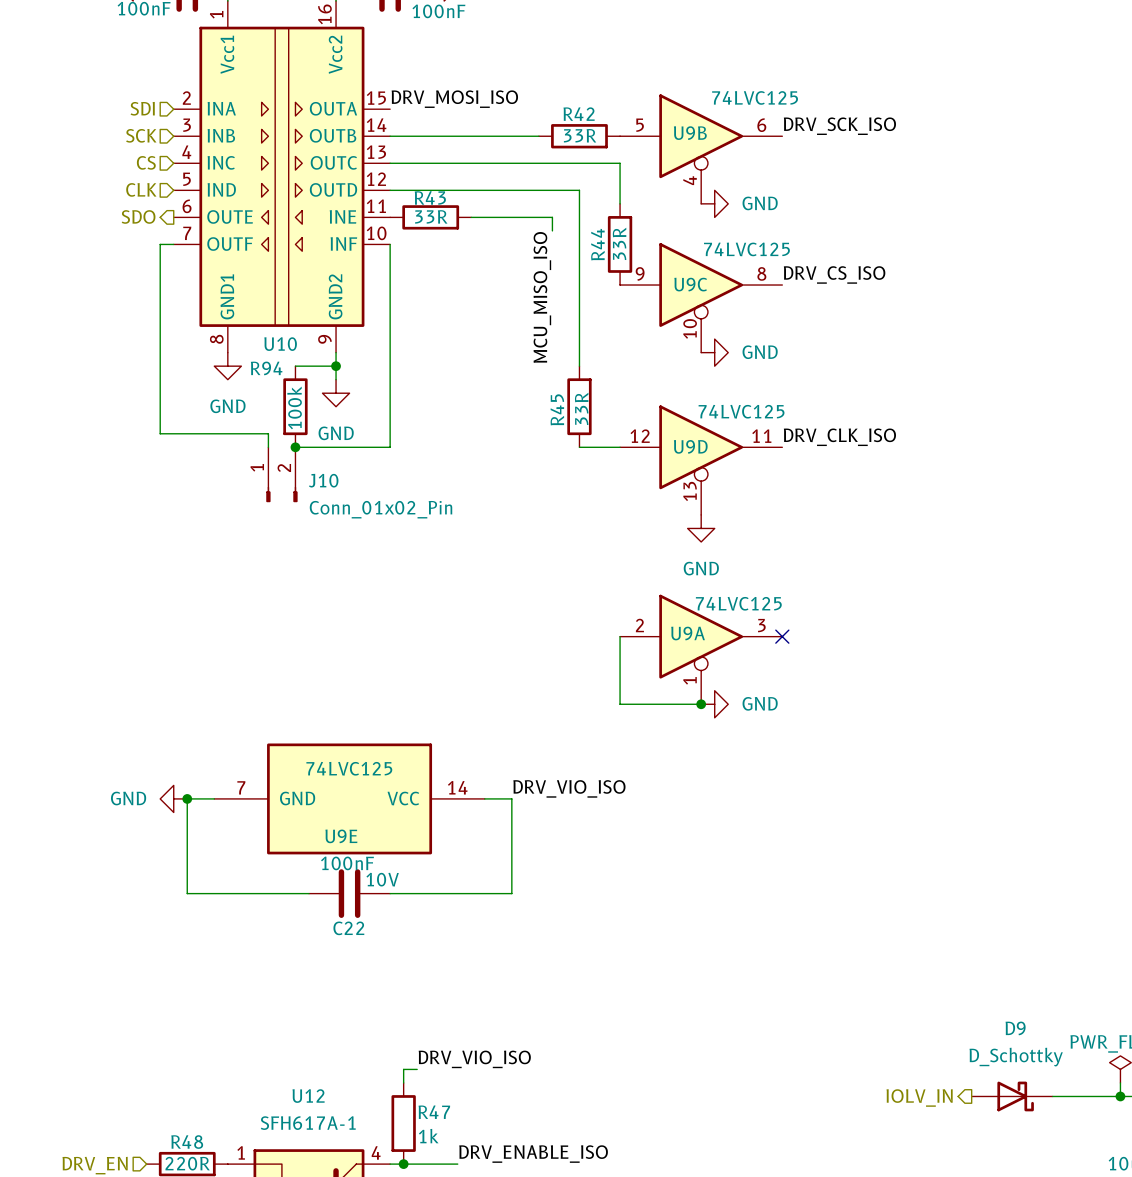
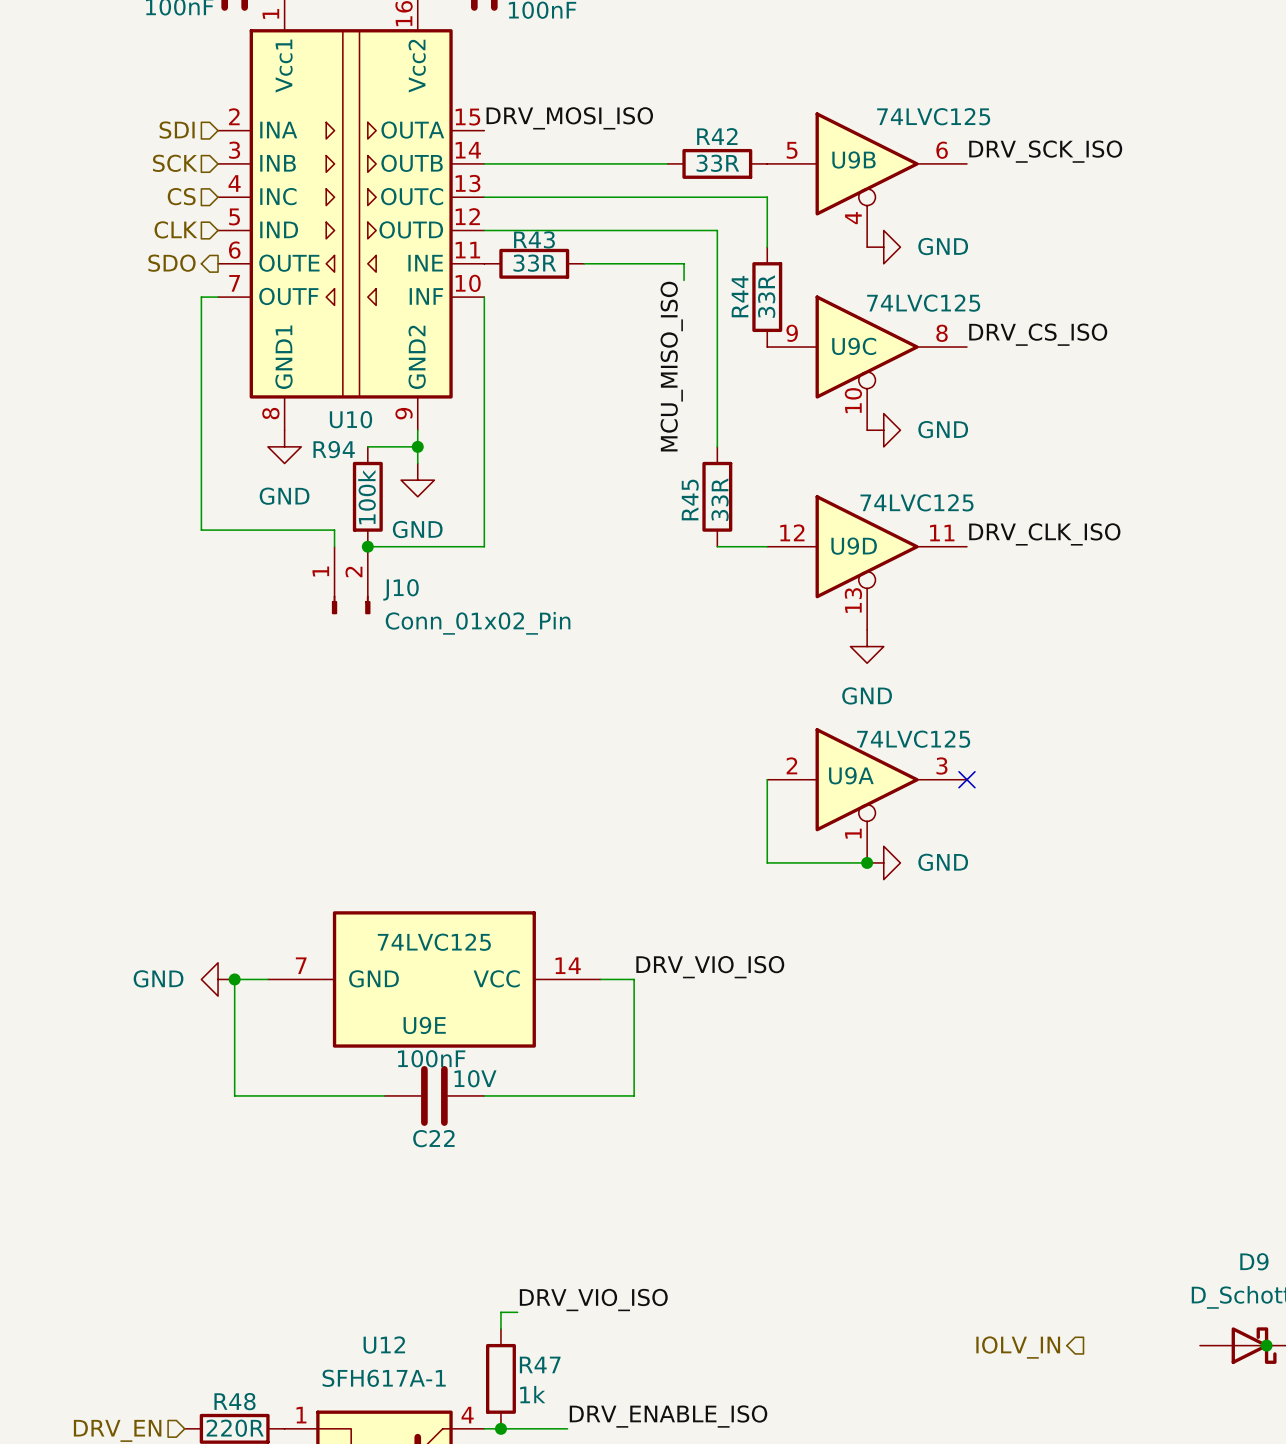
junction: none -> (1266, 1345)
hierarchical label position: IOLV_IN (919, 1097) -> IOLV_IN (1018, 1347)

